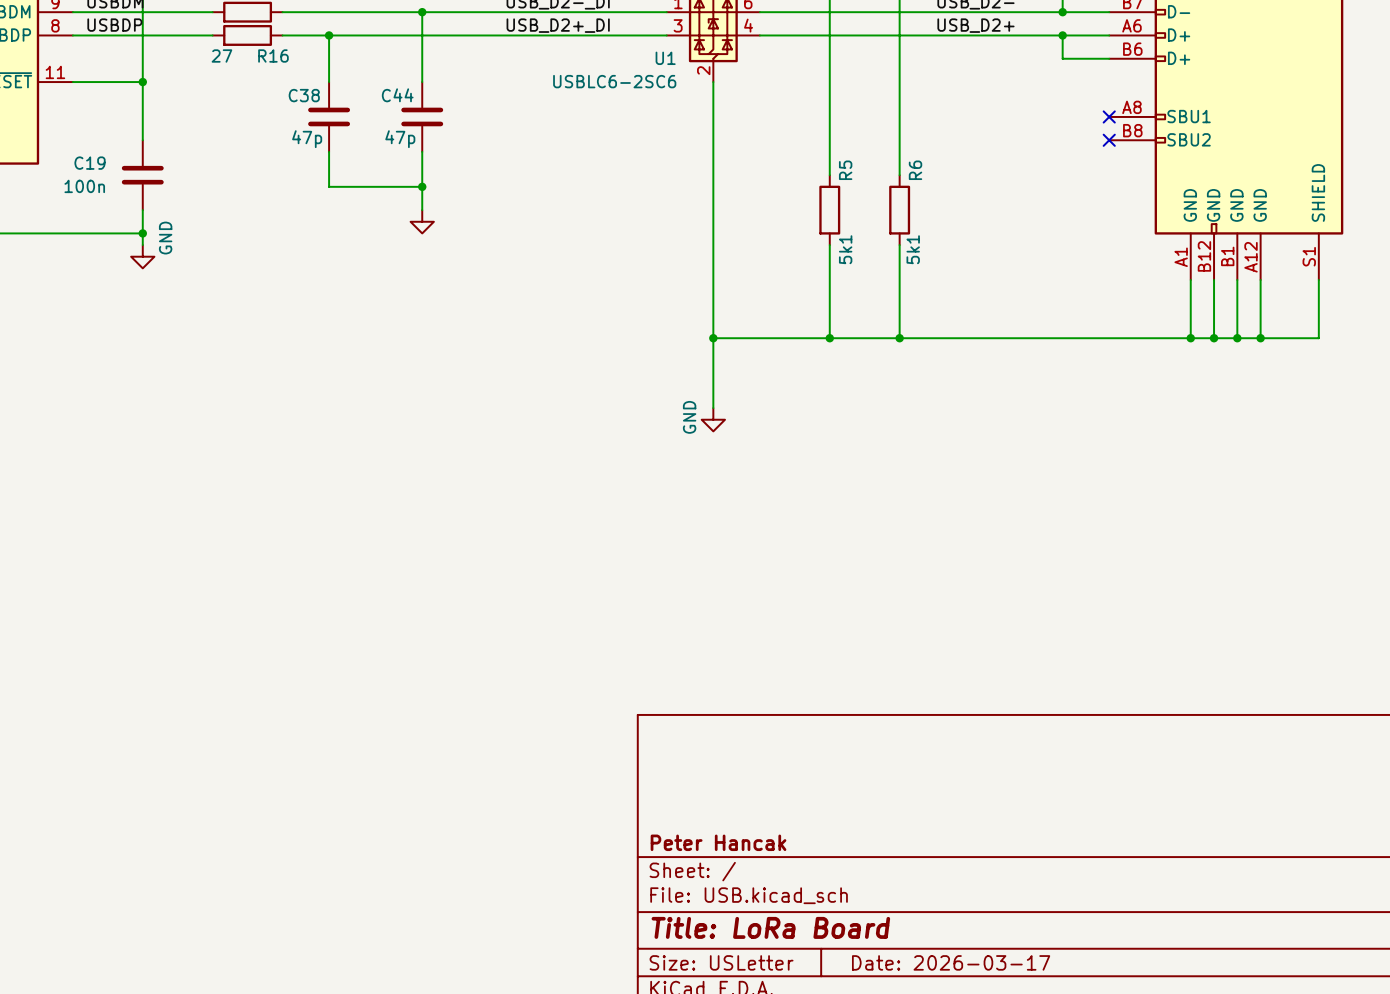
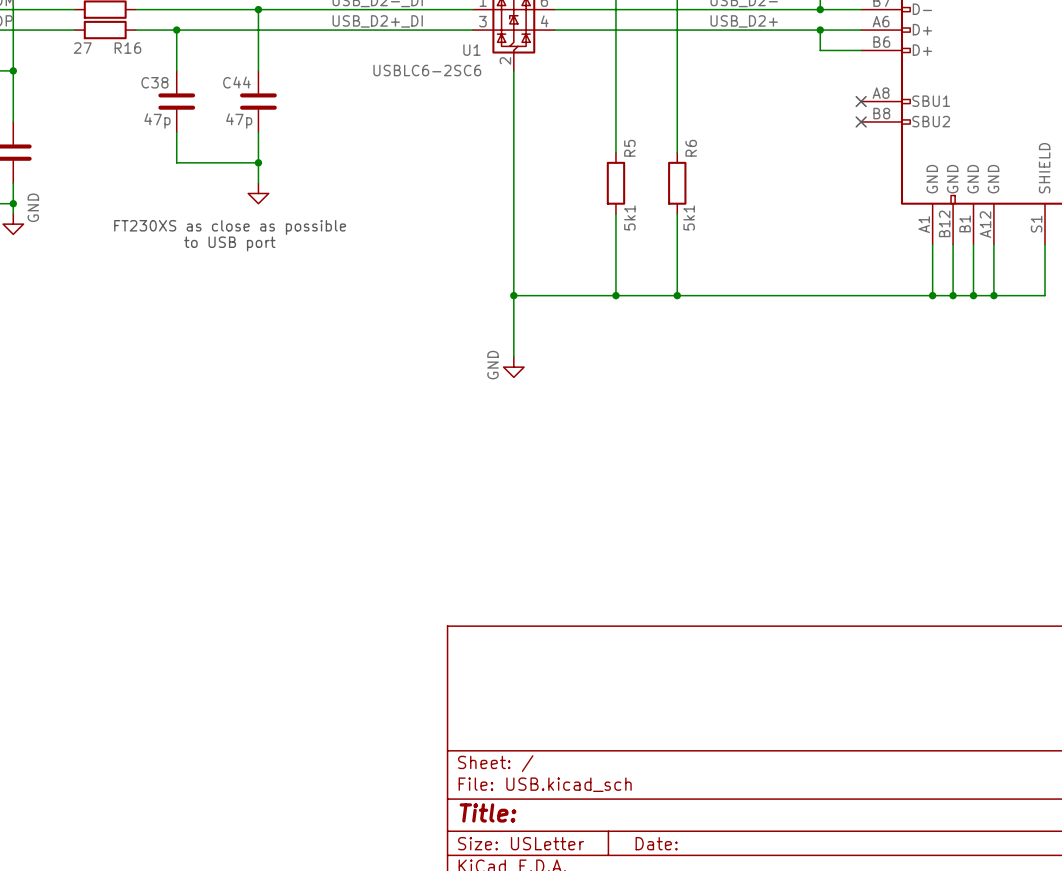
text: none -> FT230XS as close as possible (230, 227)
text: none -> to USB port (229, 243)
title block: Peter Hancak (718, 842) -> none
title block: Title: LoRa Board (770, 927) -> Title: (488, 812)
title block: Date: 2026-03-17 (951, 962) -> Date: (656, 843)

